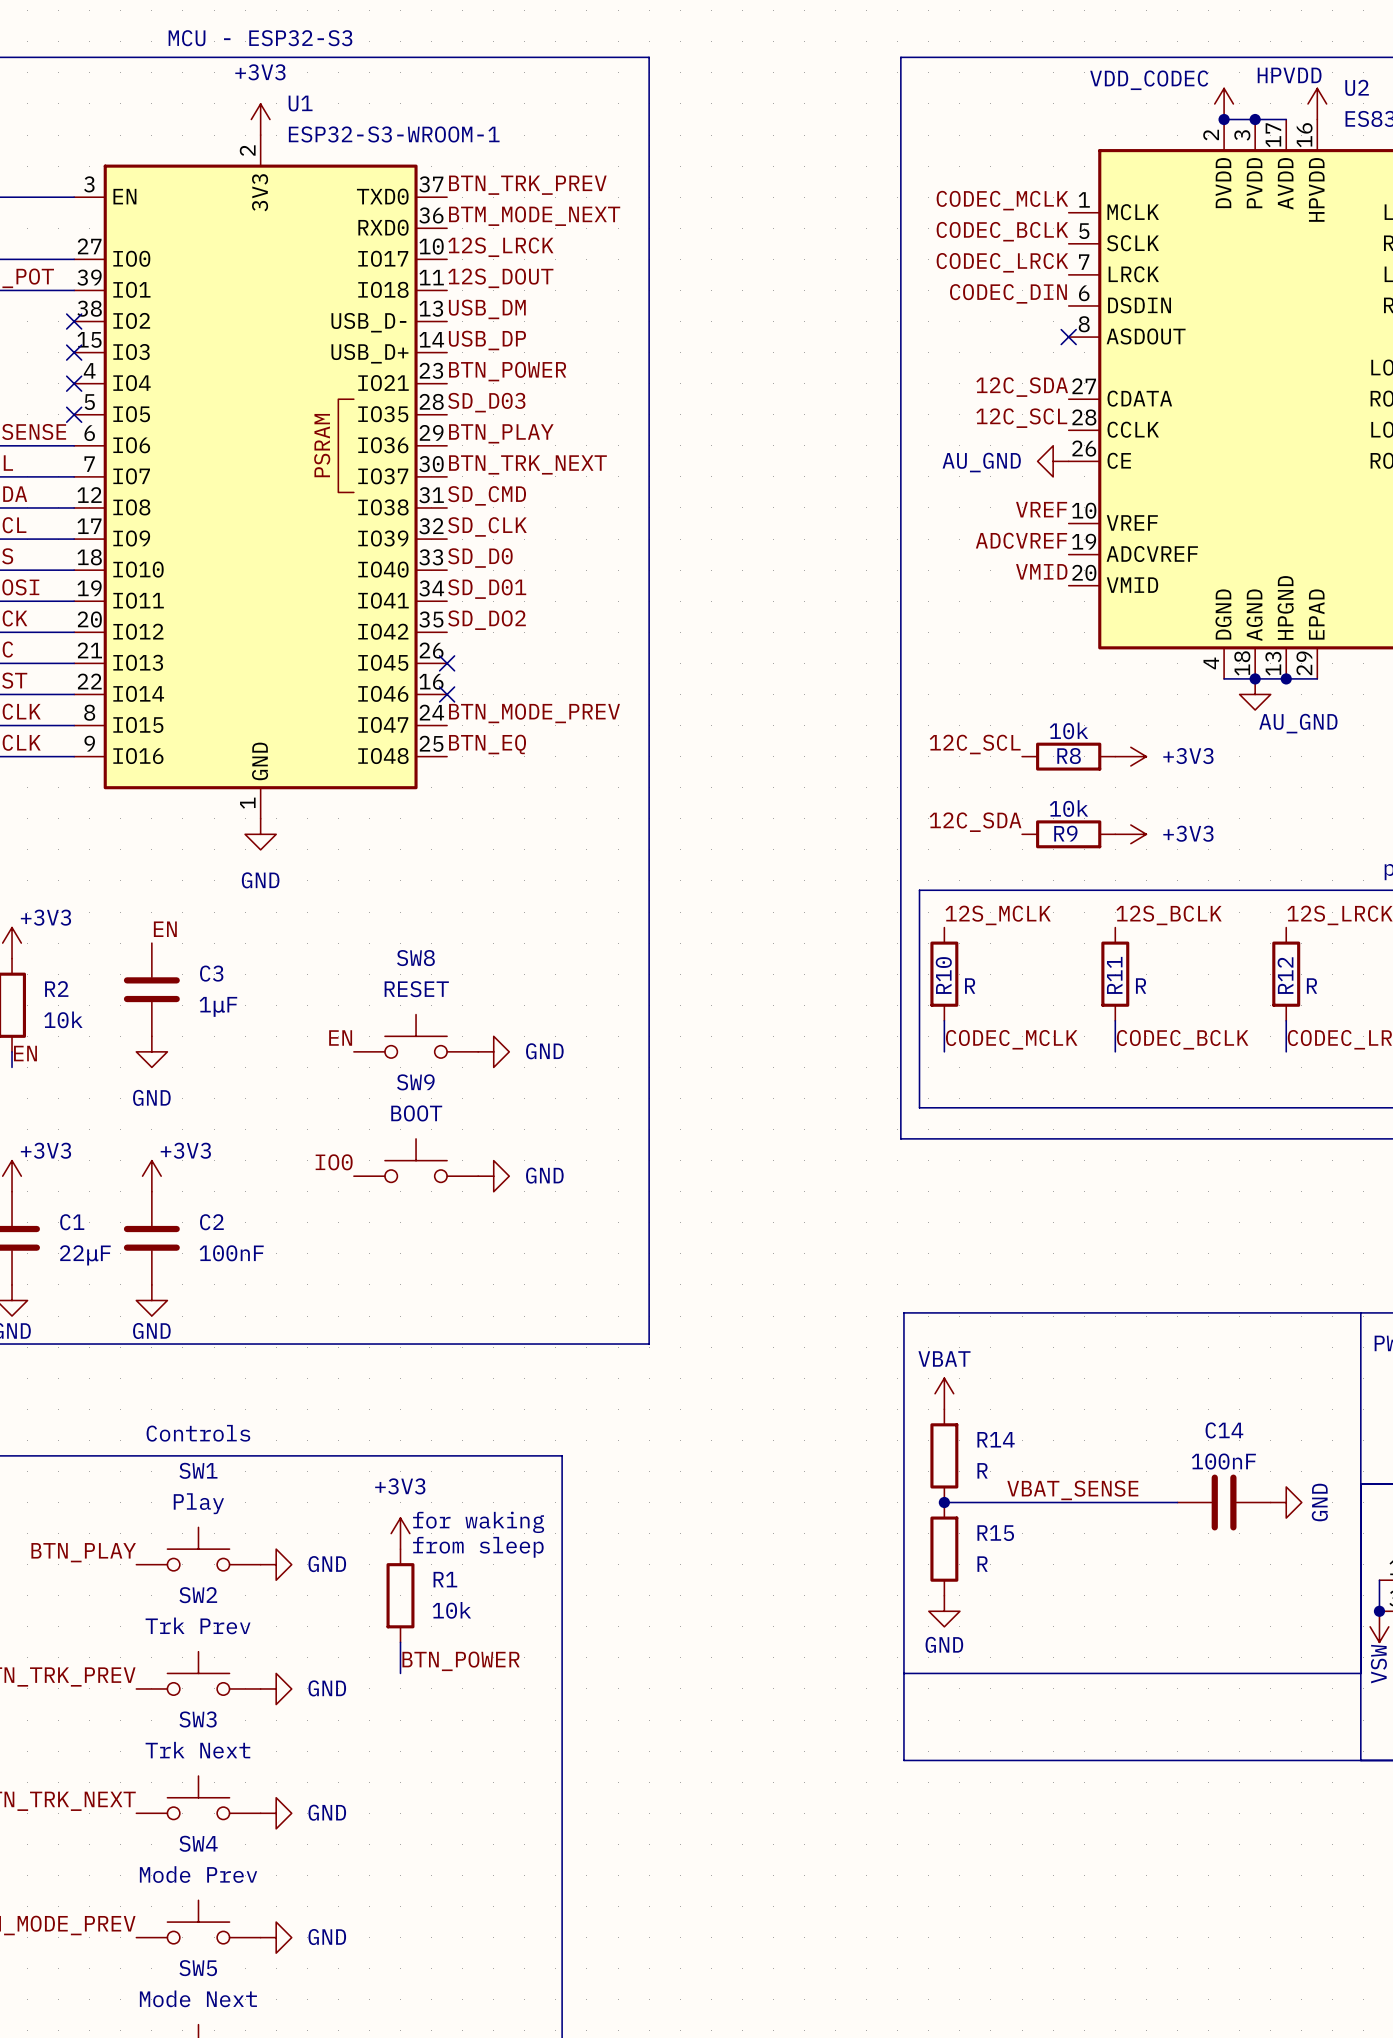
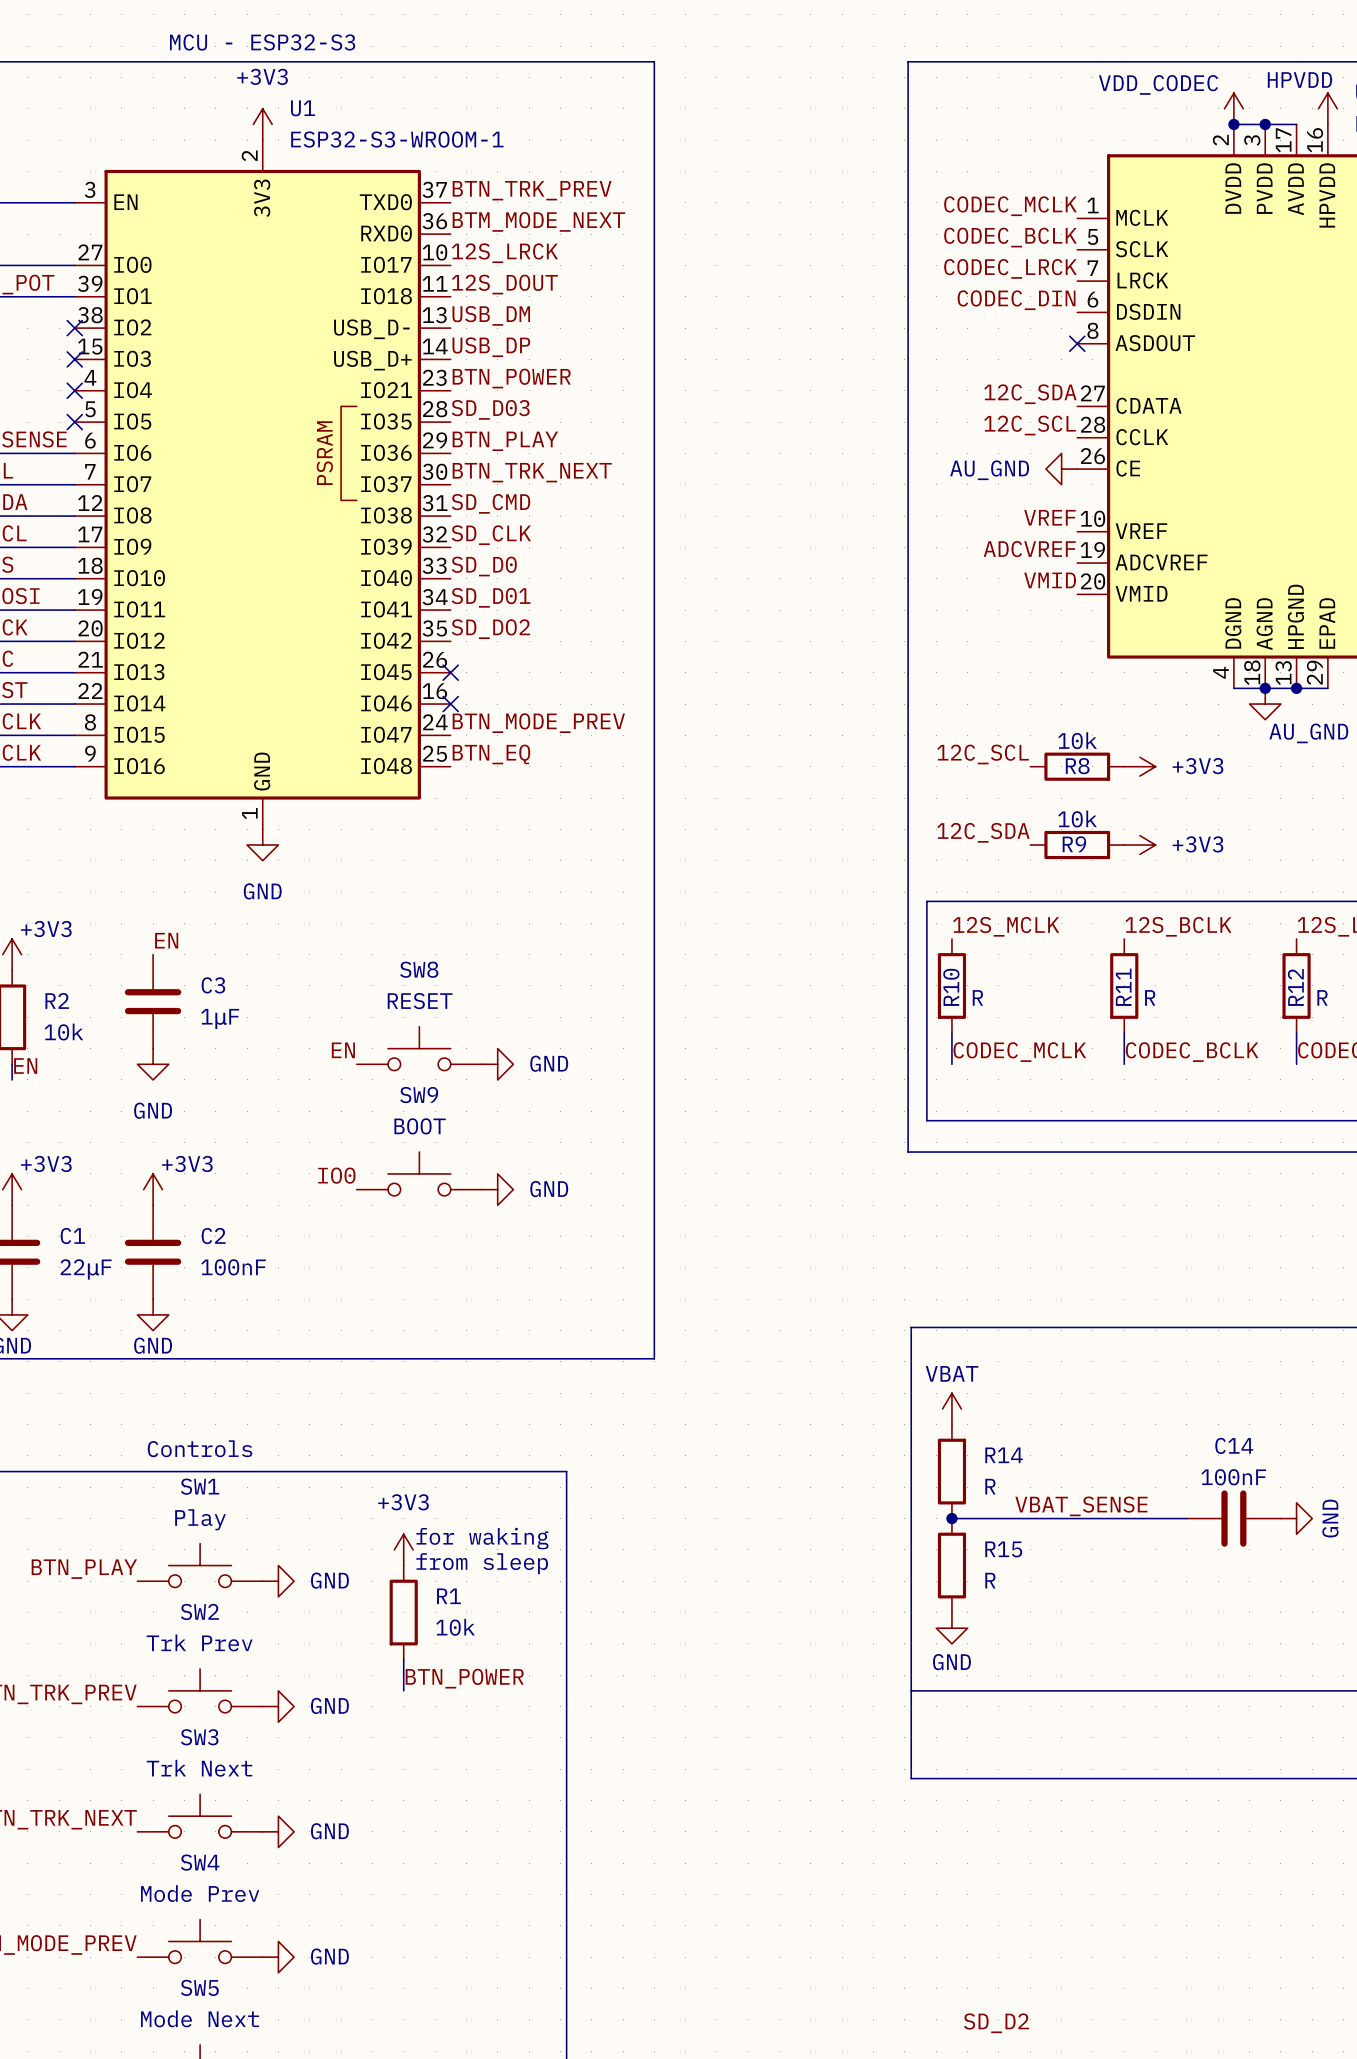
label: none -> SD_D2 (996, 2023)

